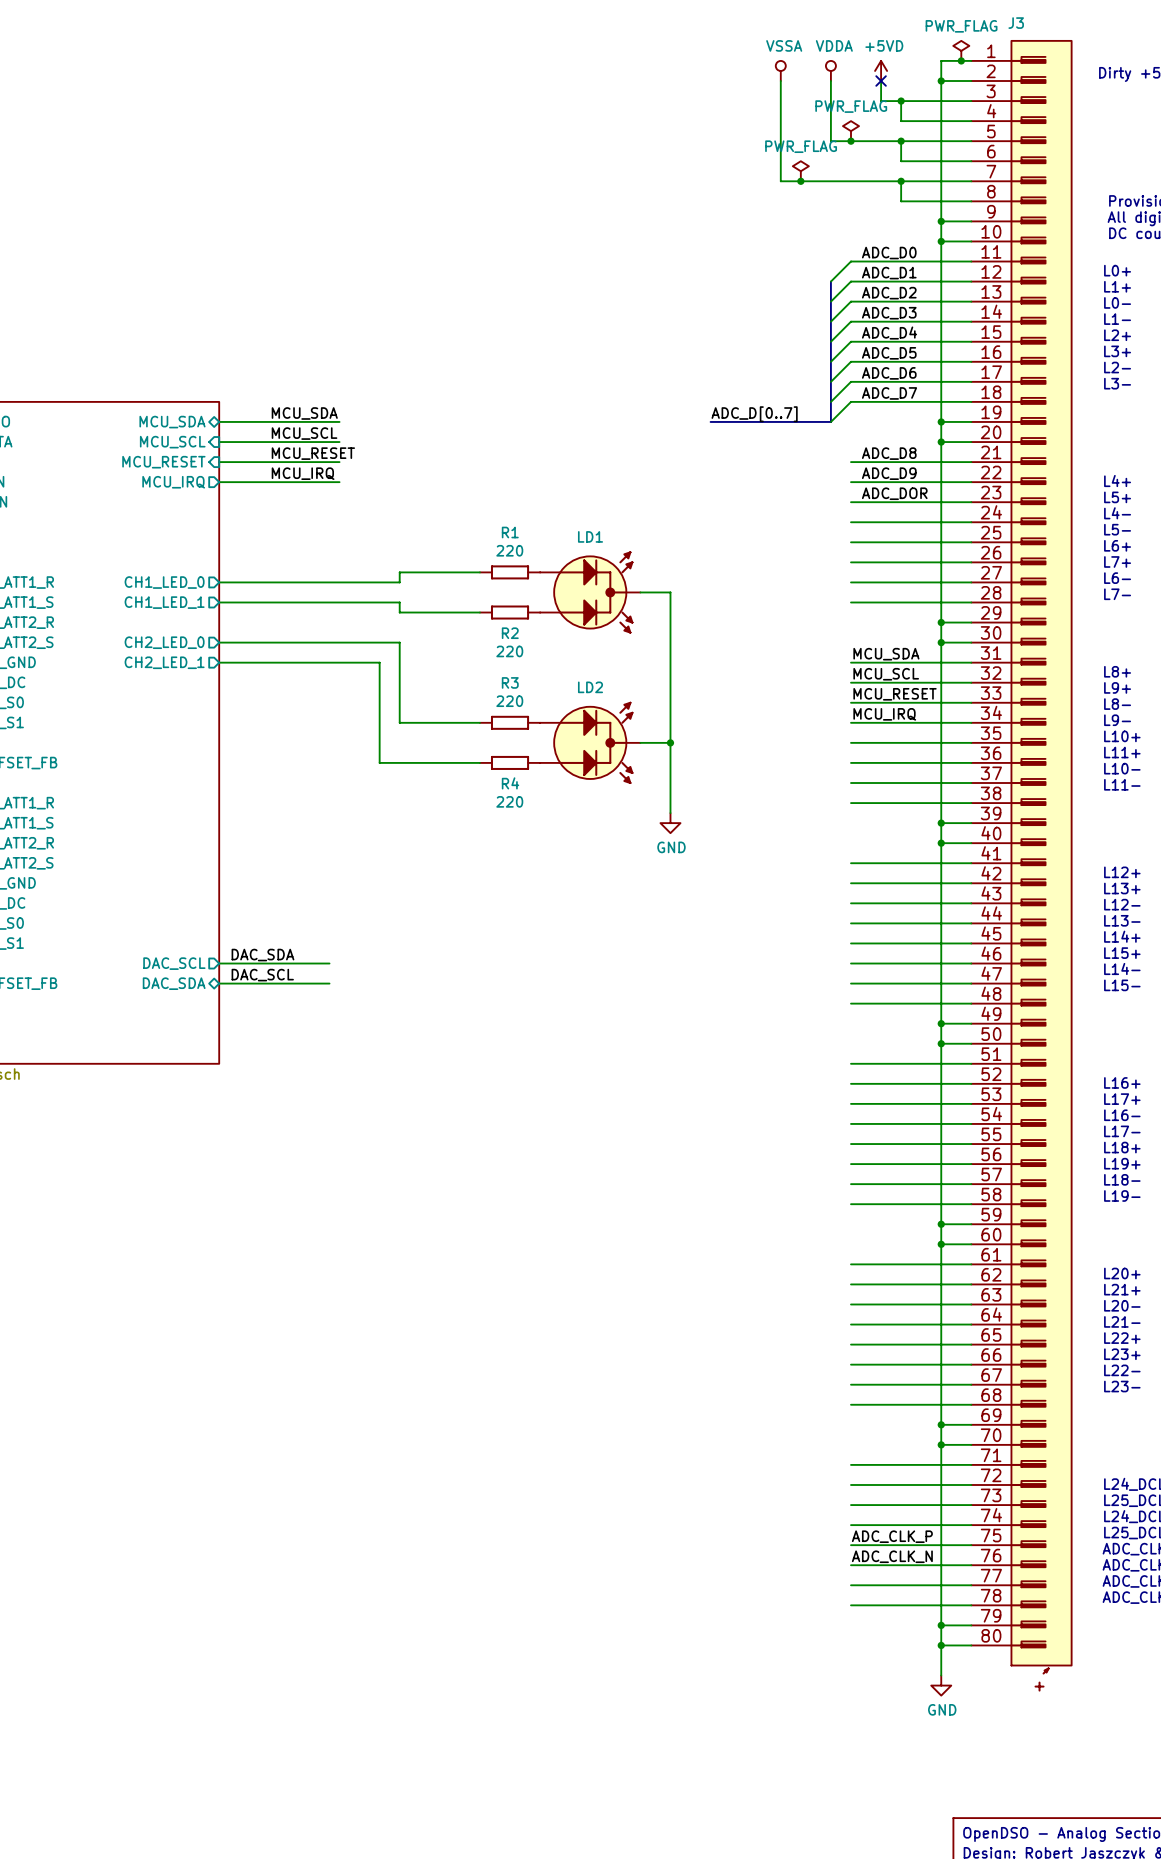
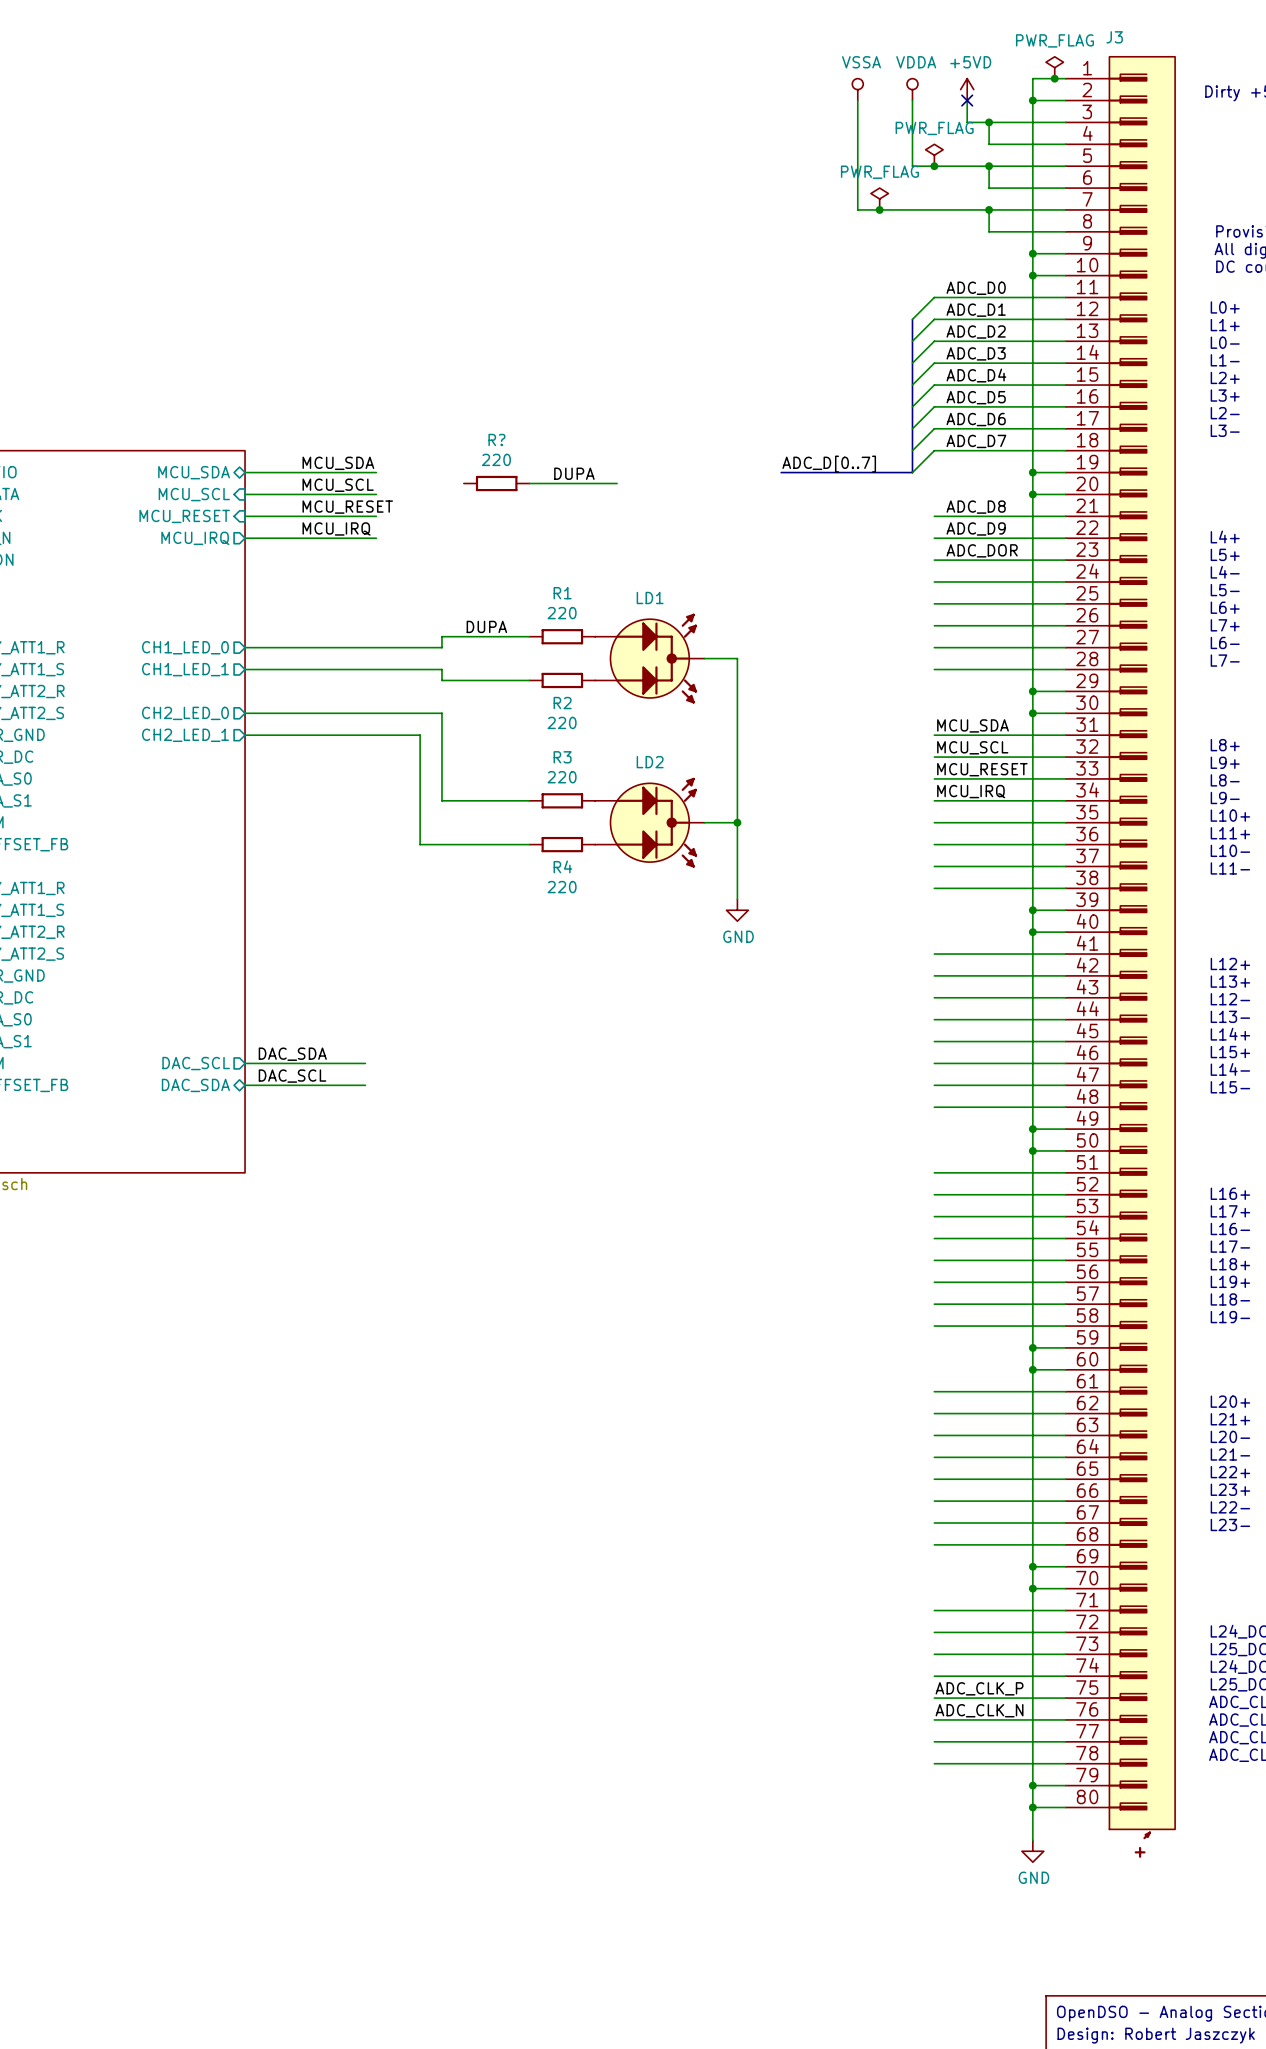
label: none -> DUPA (574, 473)
R?: none -> (496, 483)
wire: none -> (529, 483) (617, 483)
label: none -> DUPA (486, 626)

